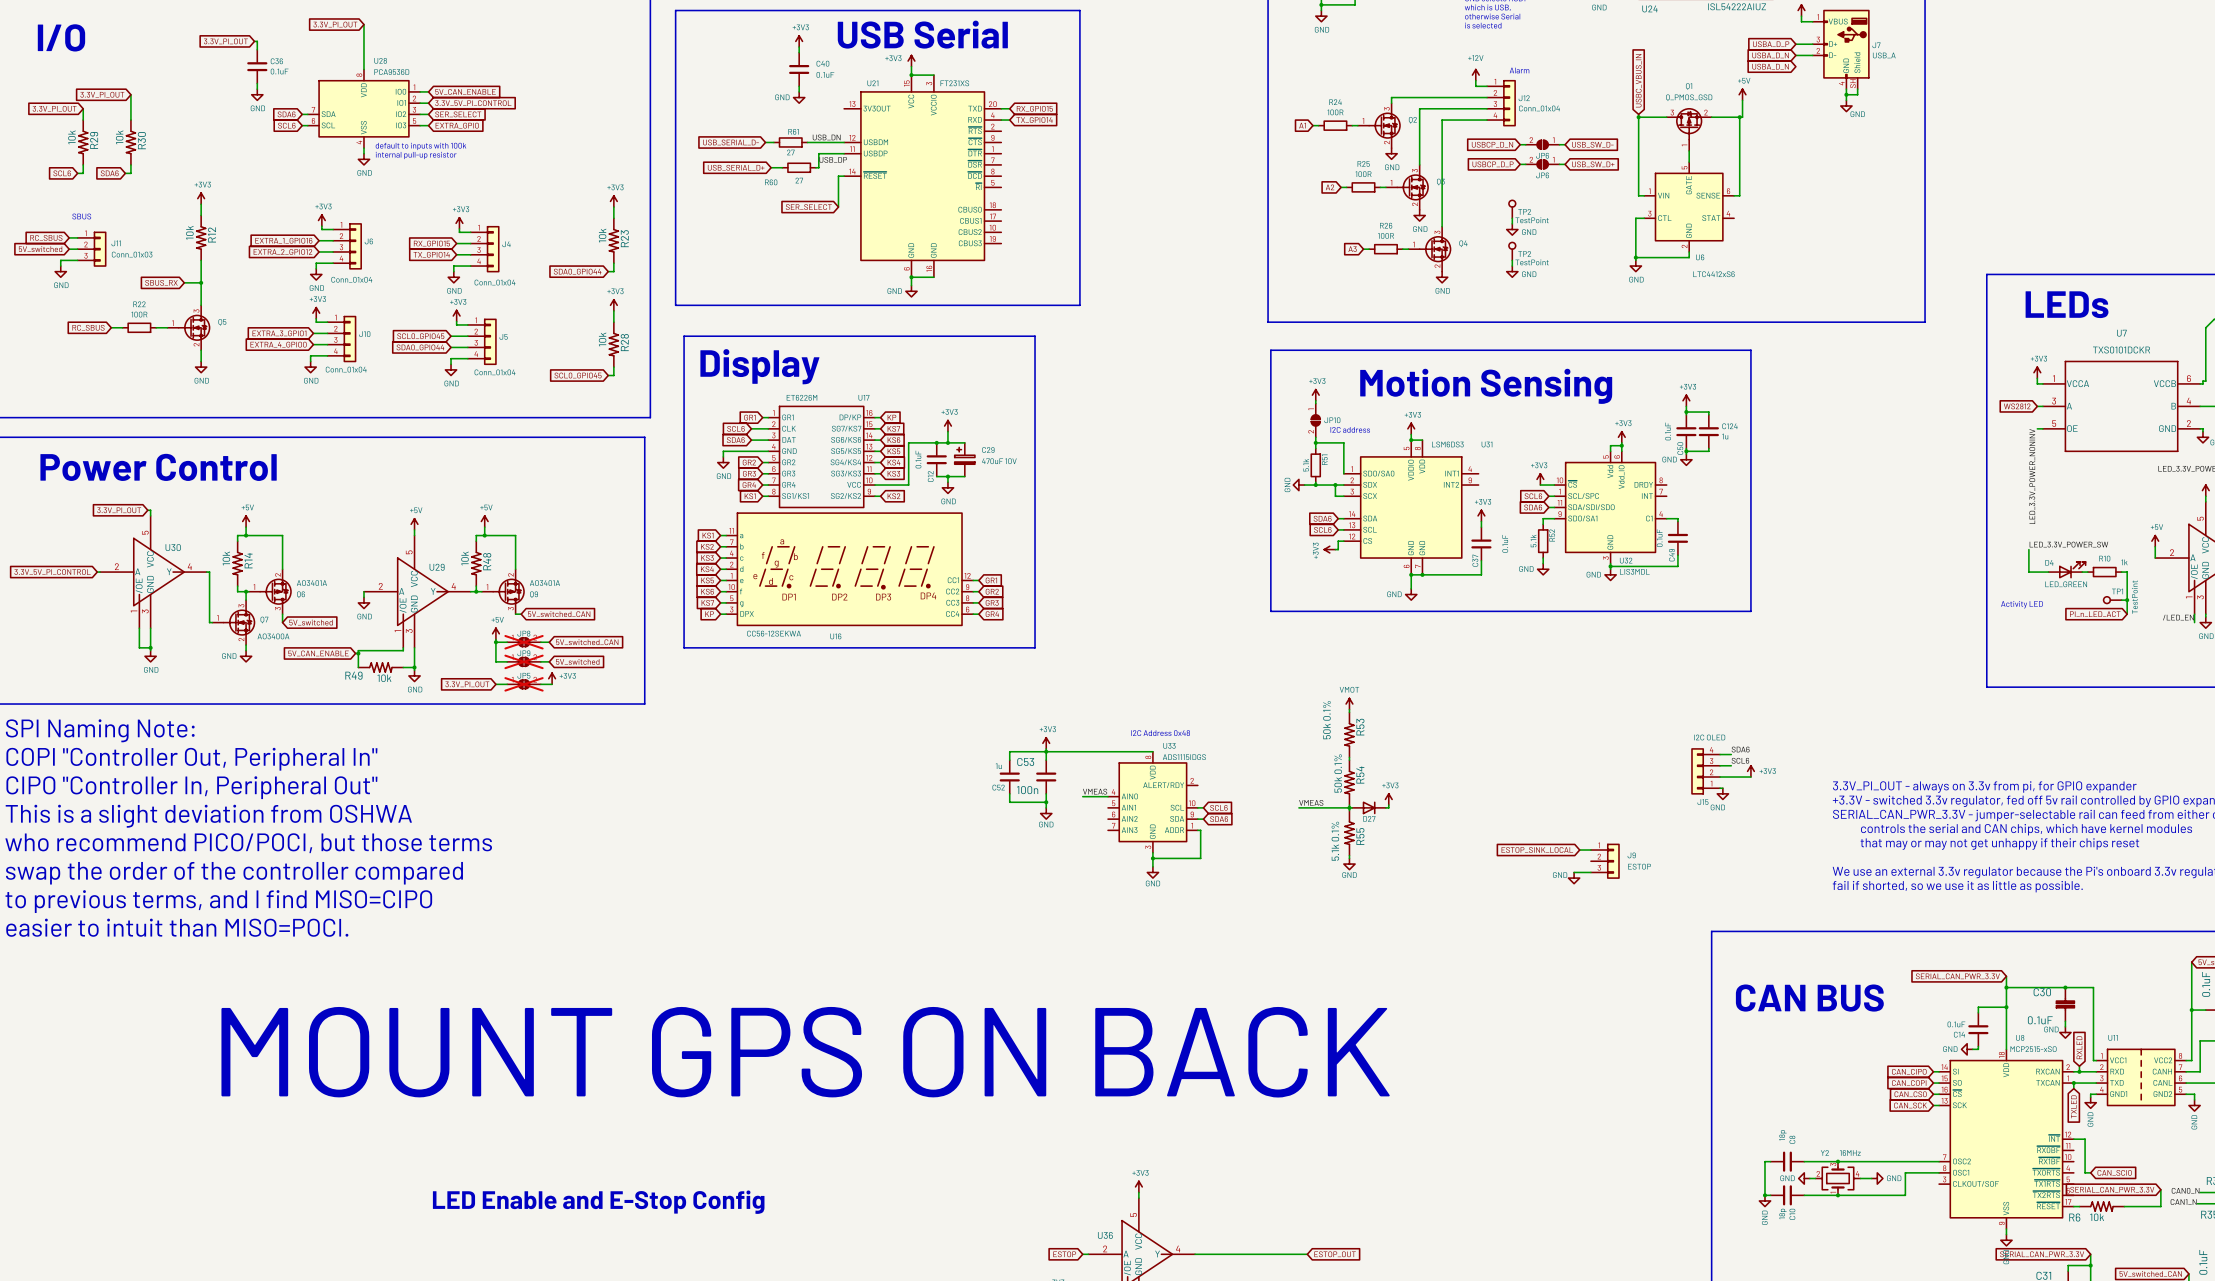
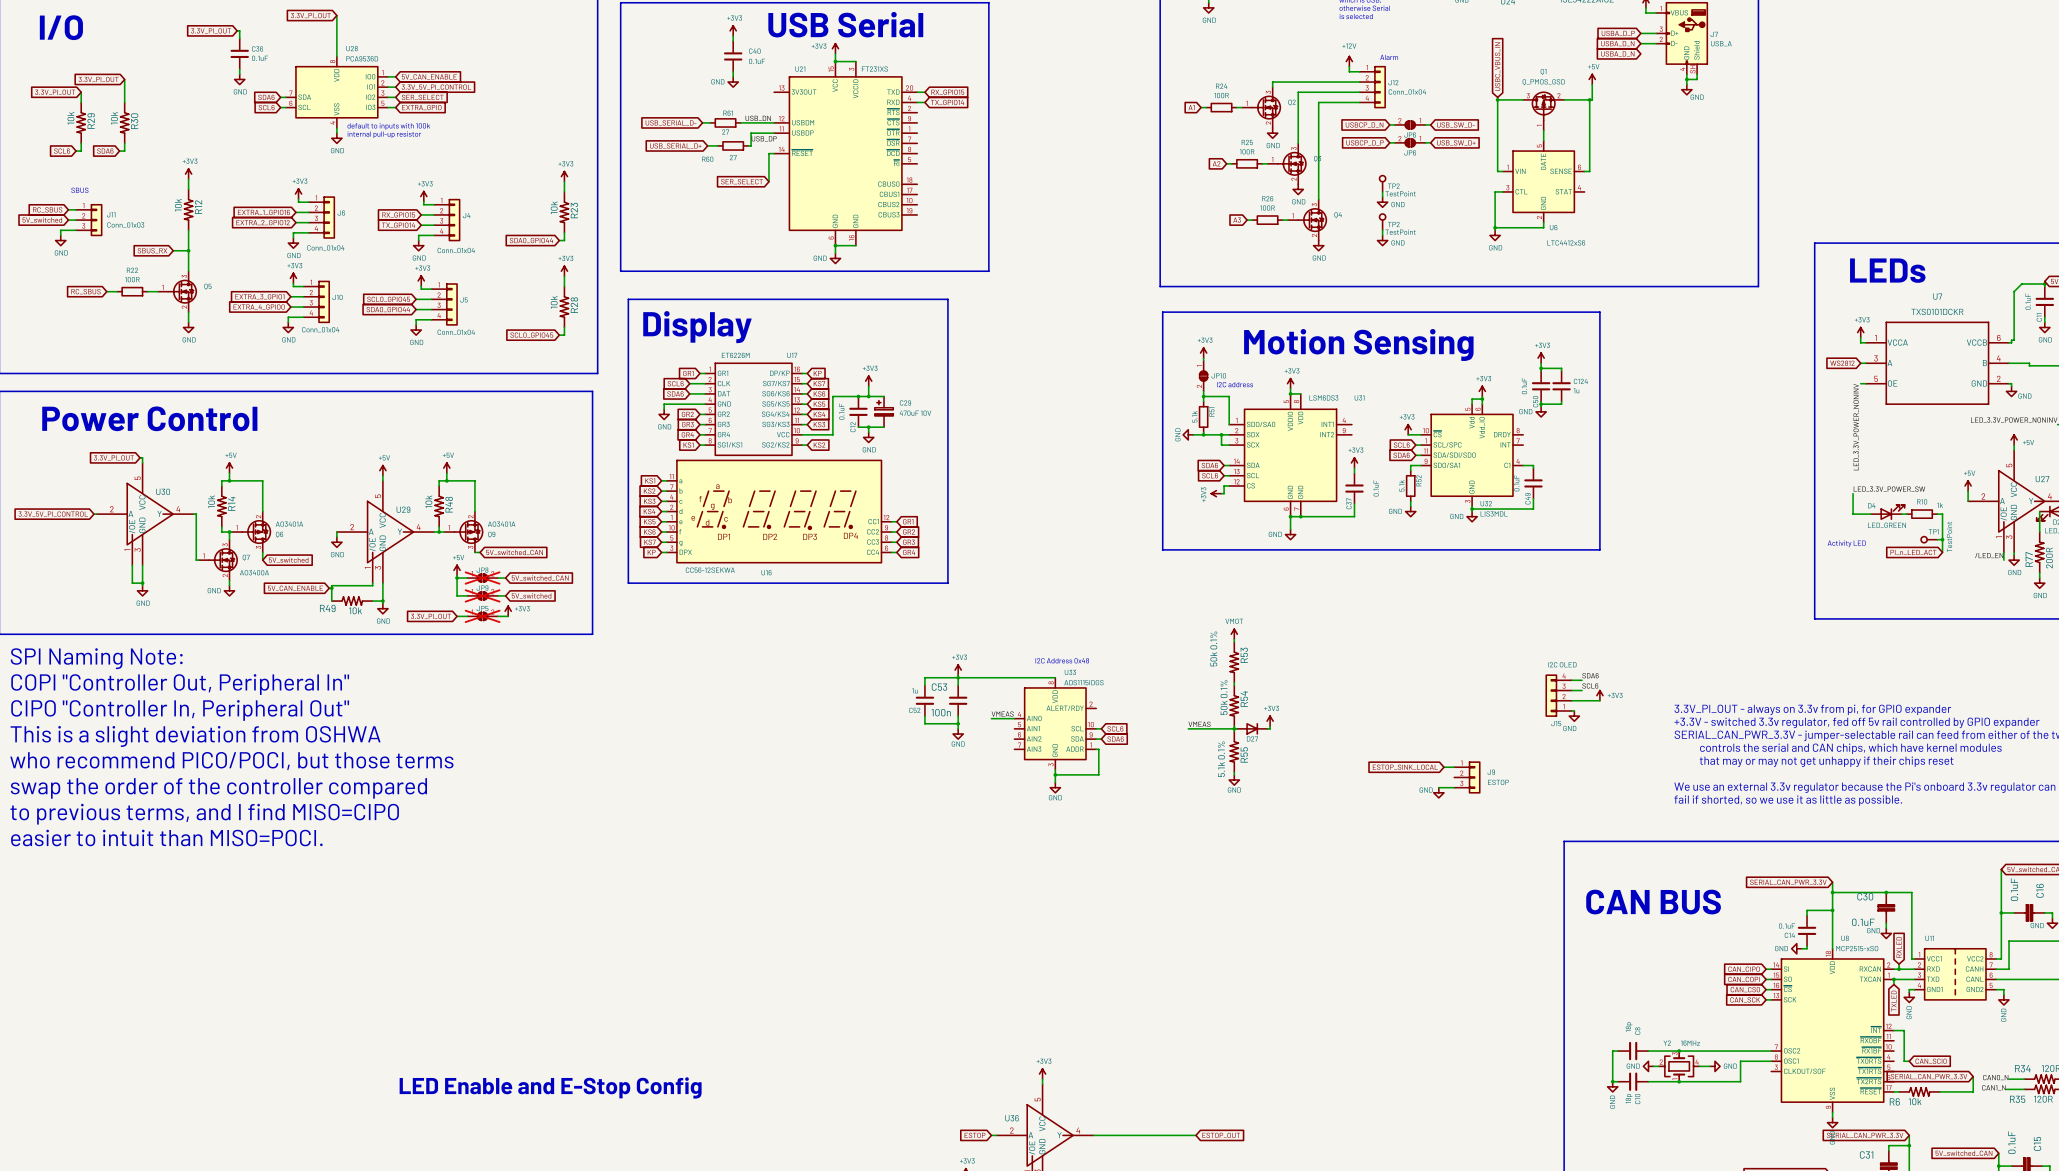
text: MOUNT GPS ON BACK (805, 1052) -> none

